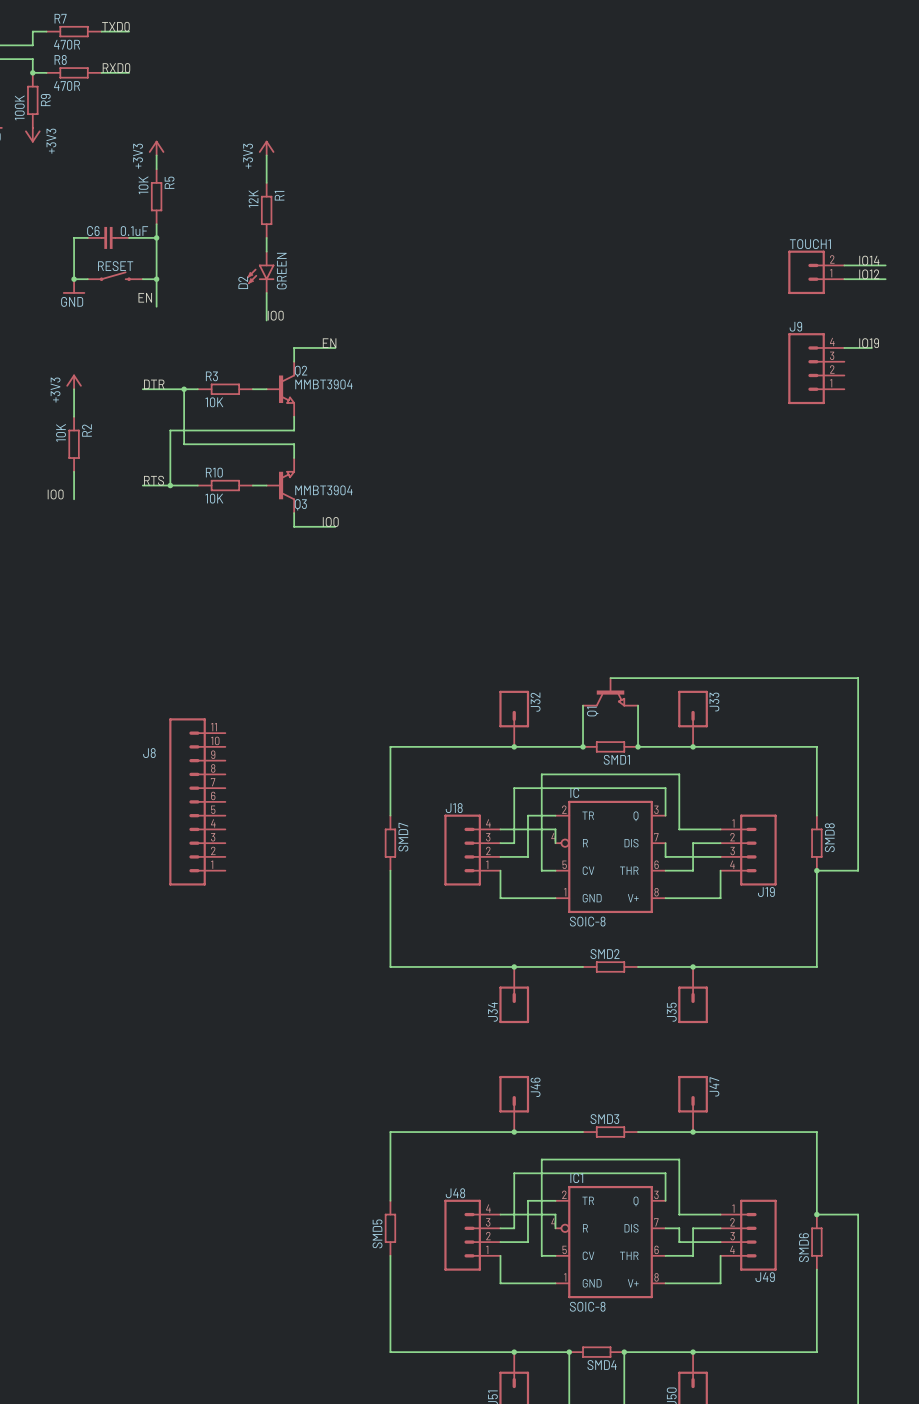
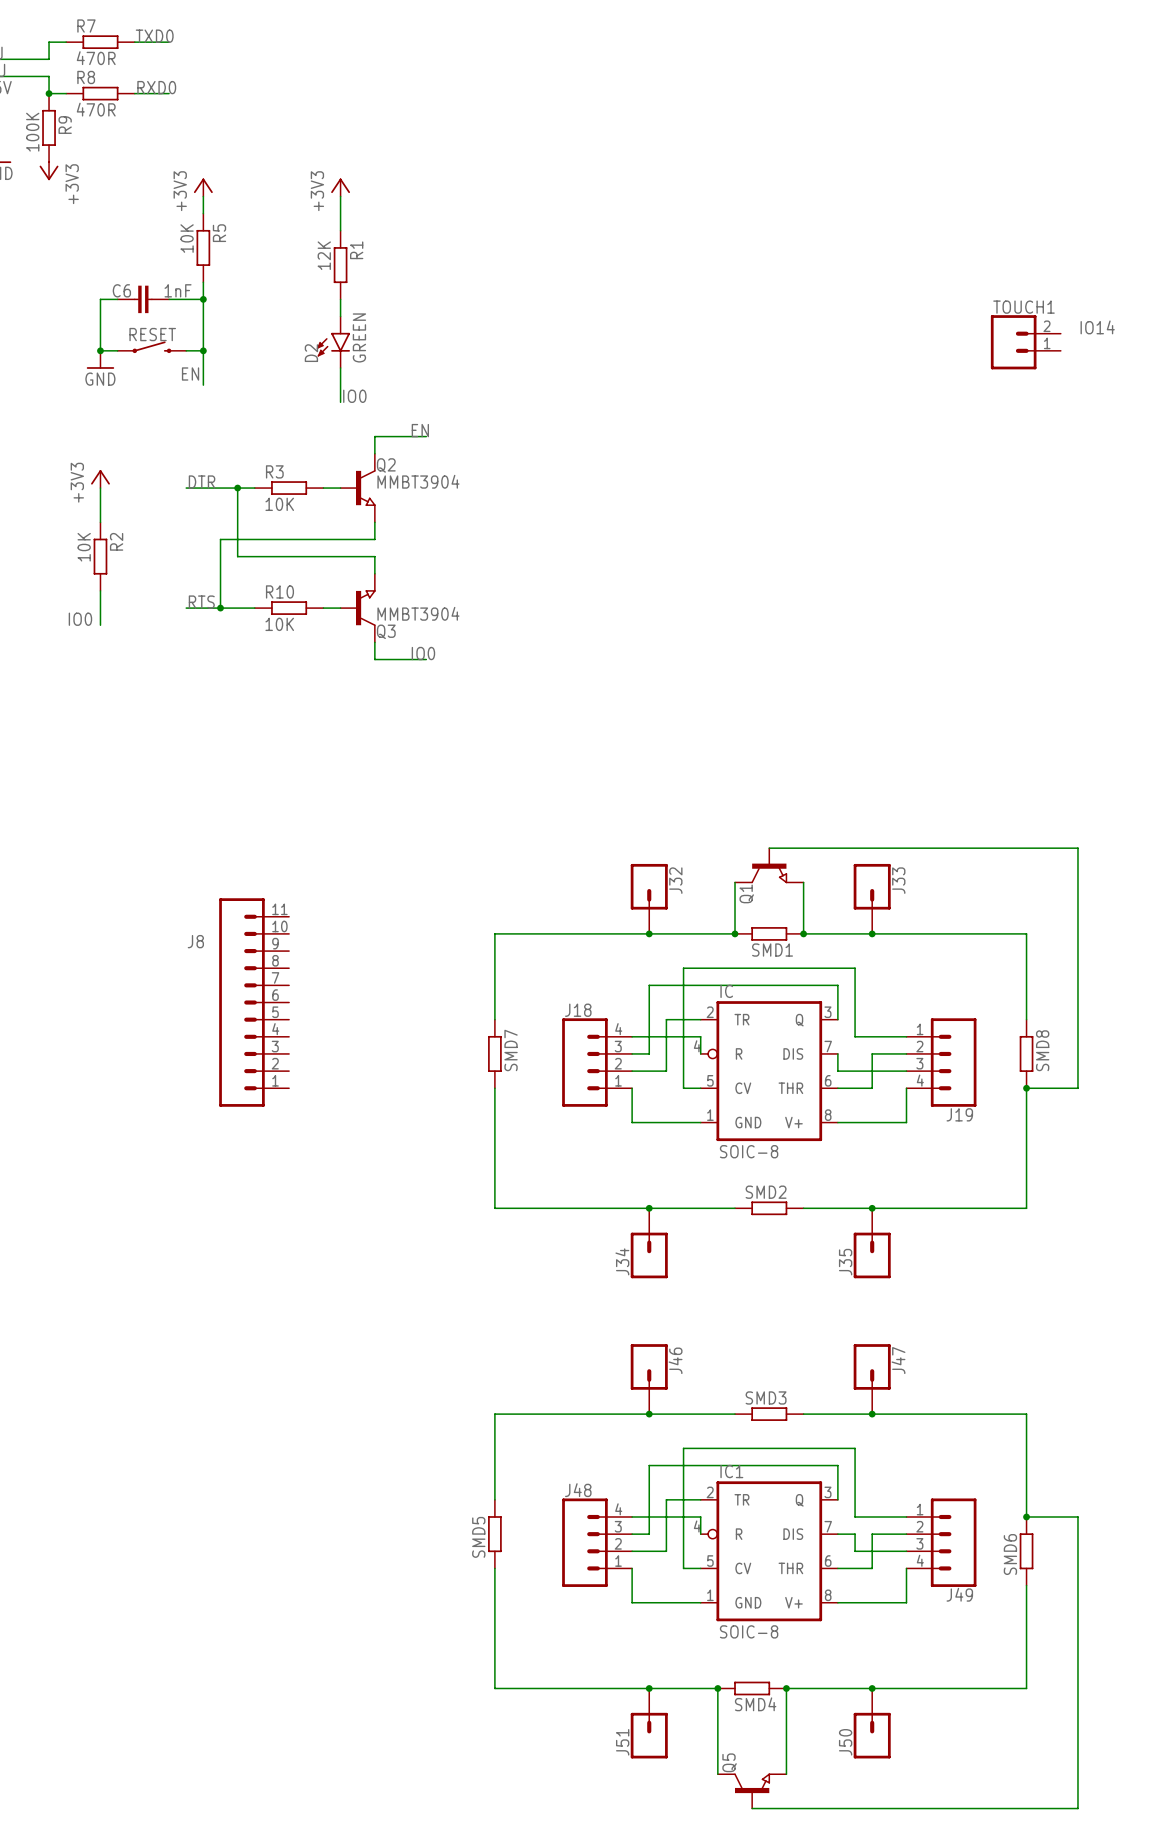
C6 value: 0.1uF (134, 231) -> 1nF (178, 290)
wire: (844, 265) (885, 265) -> none
label: IO12 (869, 274) -> none
wire: (844, 279) (885, 279) -> none
label: IO19 (869, 343) -> none
wire: (844, 347) (871, 347) -> none
J9: (816, 368) -> none

